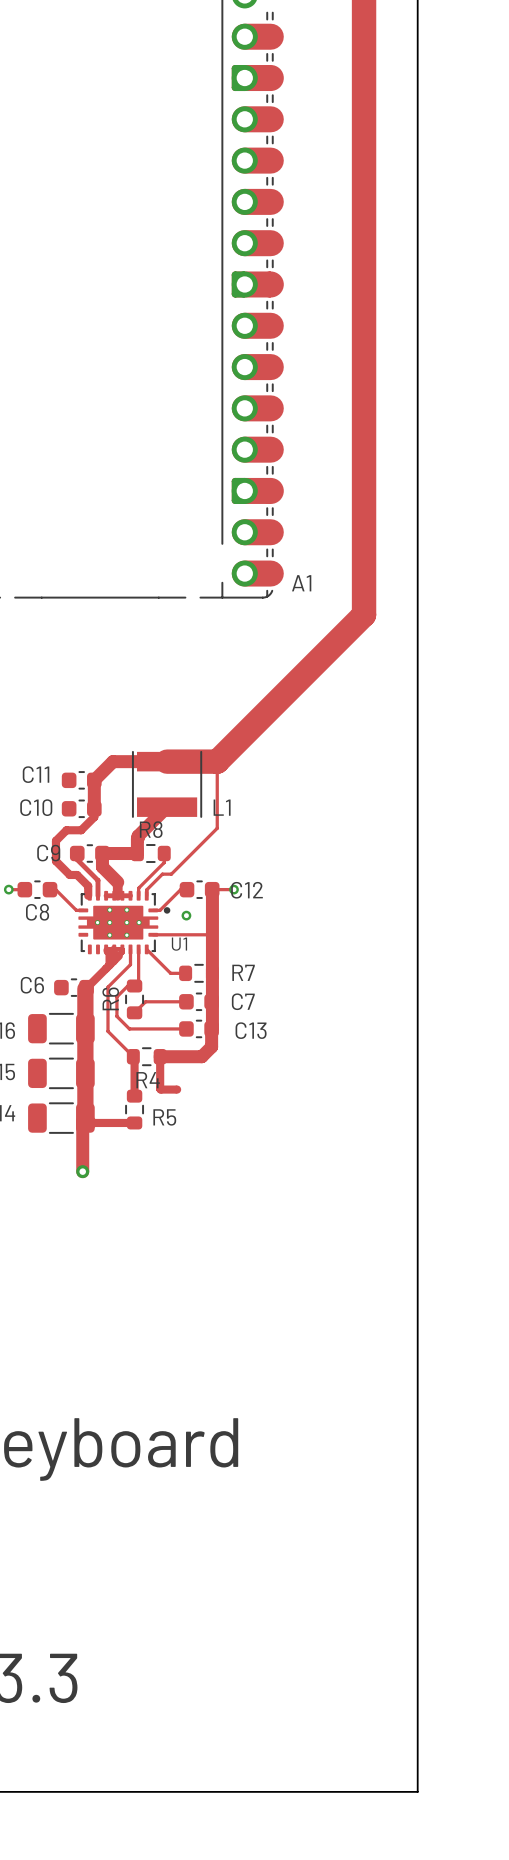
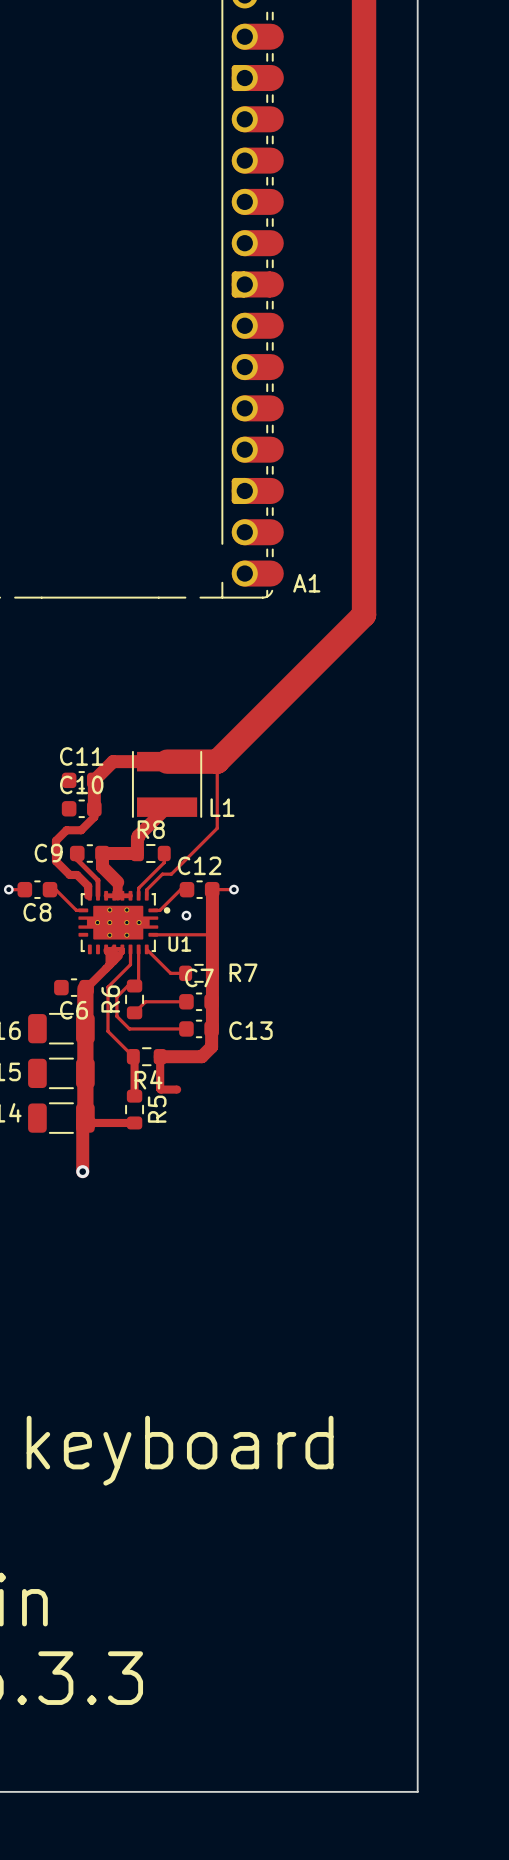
C11 name position: C11 (36, 774) -> C11 (81, 756)
C10 name position: C10 (36, 807) -> C10 (81, 784)
C12 name position: C12 (247, 890) -> C12 (199, 865)
C6 name position: C6 (32, 985) -> C6 (74, 1010)
C7 name position: C7 (243, 1001) -> C7 (199, 977)
R5 name rotation: 0° (164, 1117) -> 90° counterclockwise (157, 1109)

